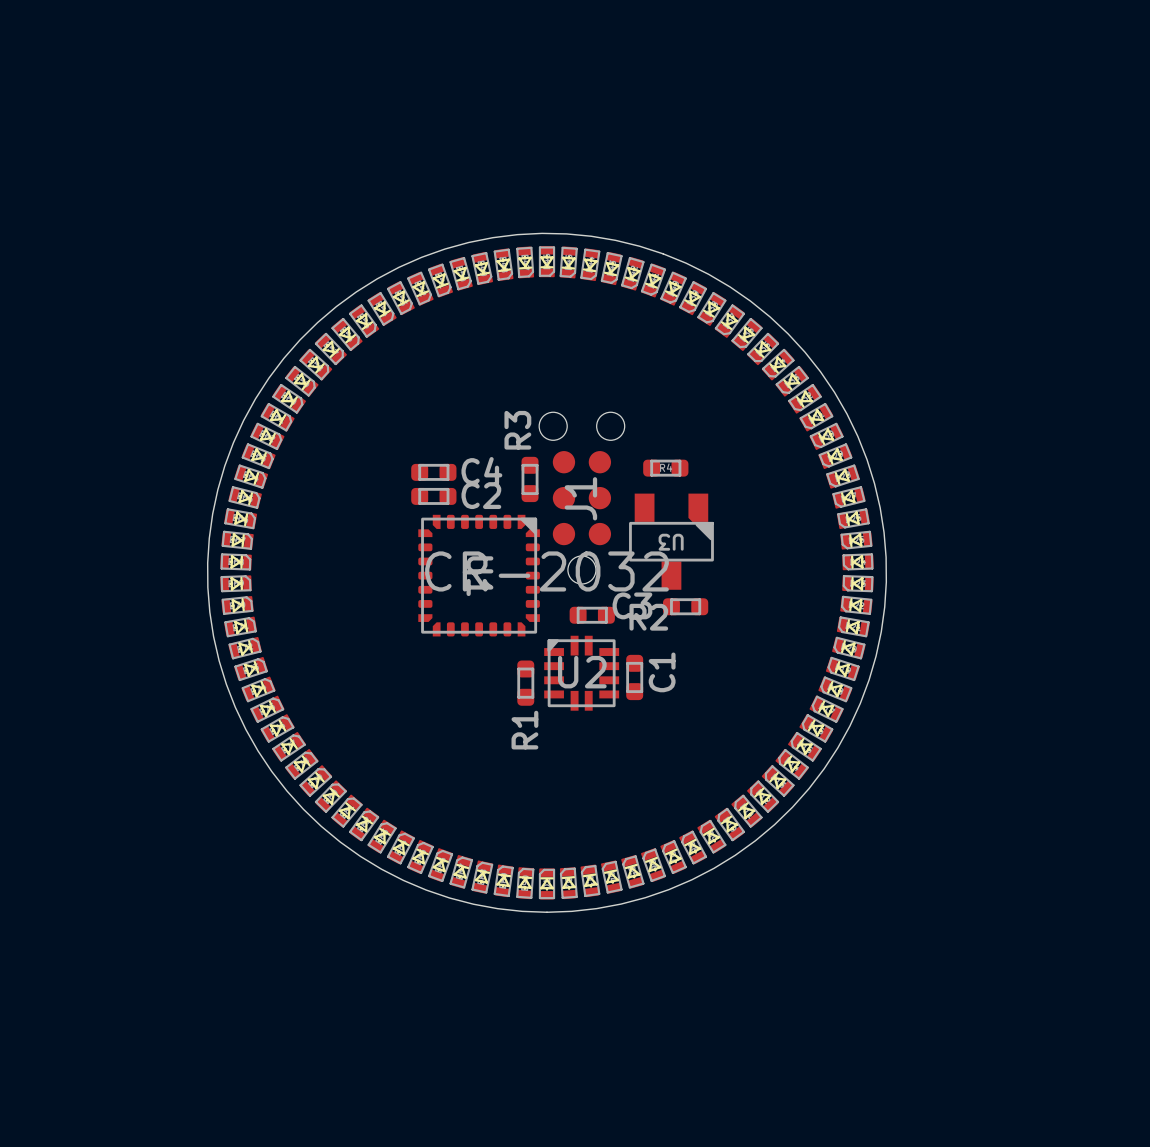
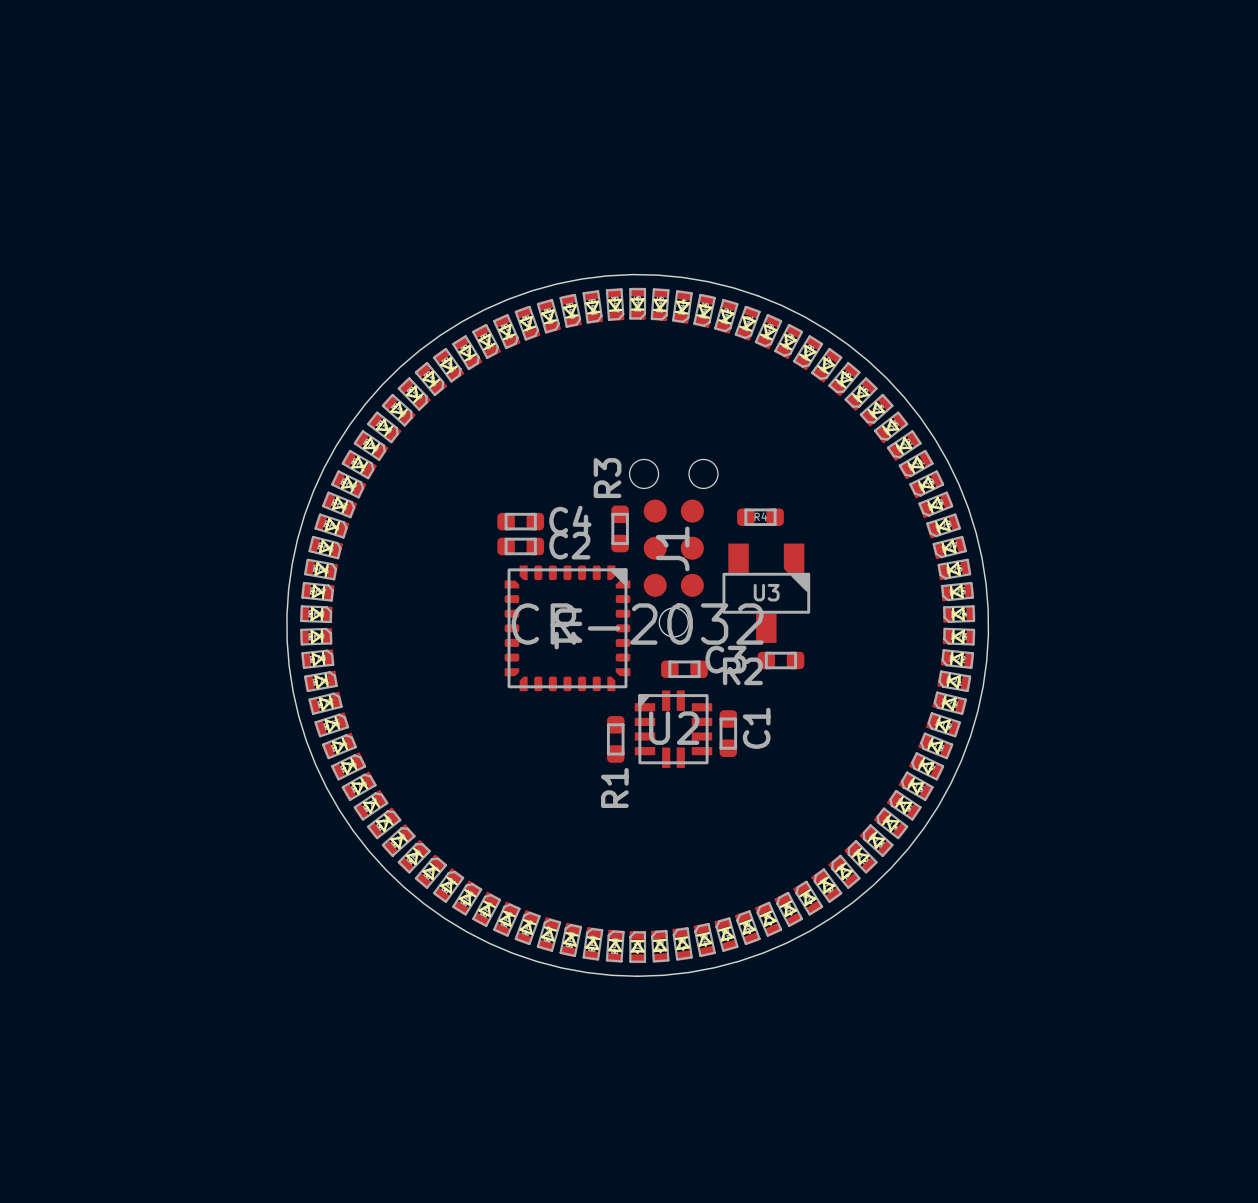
U3 name rotation: 0° (671, 542) -> 180° (766, 592)

